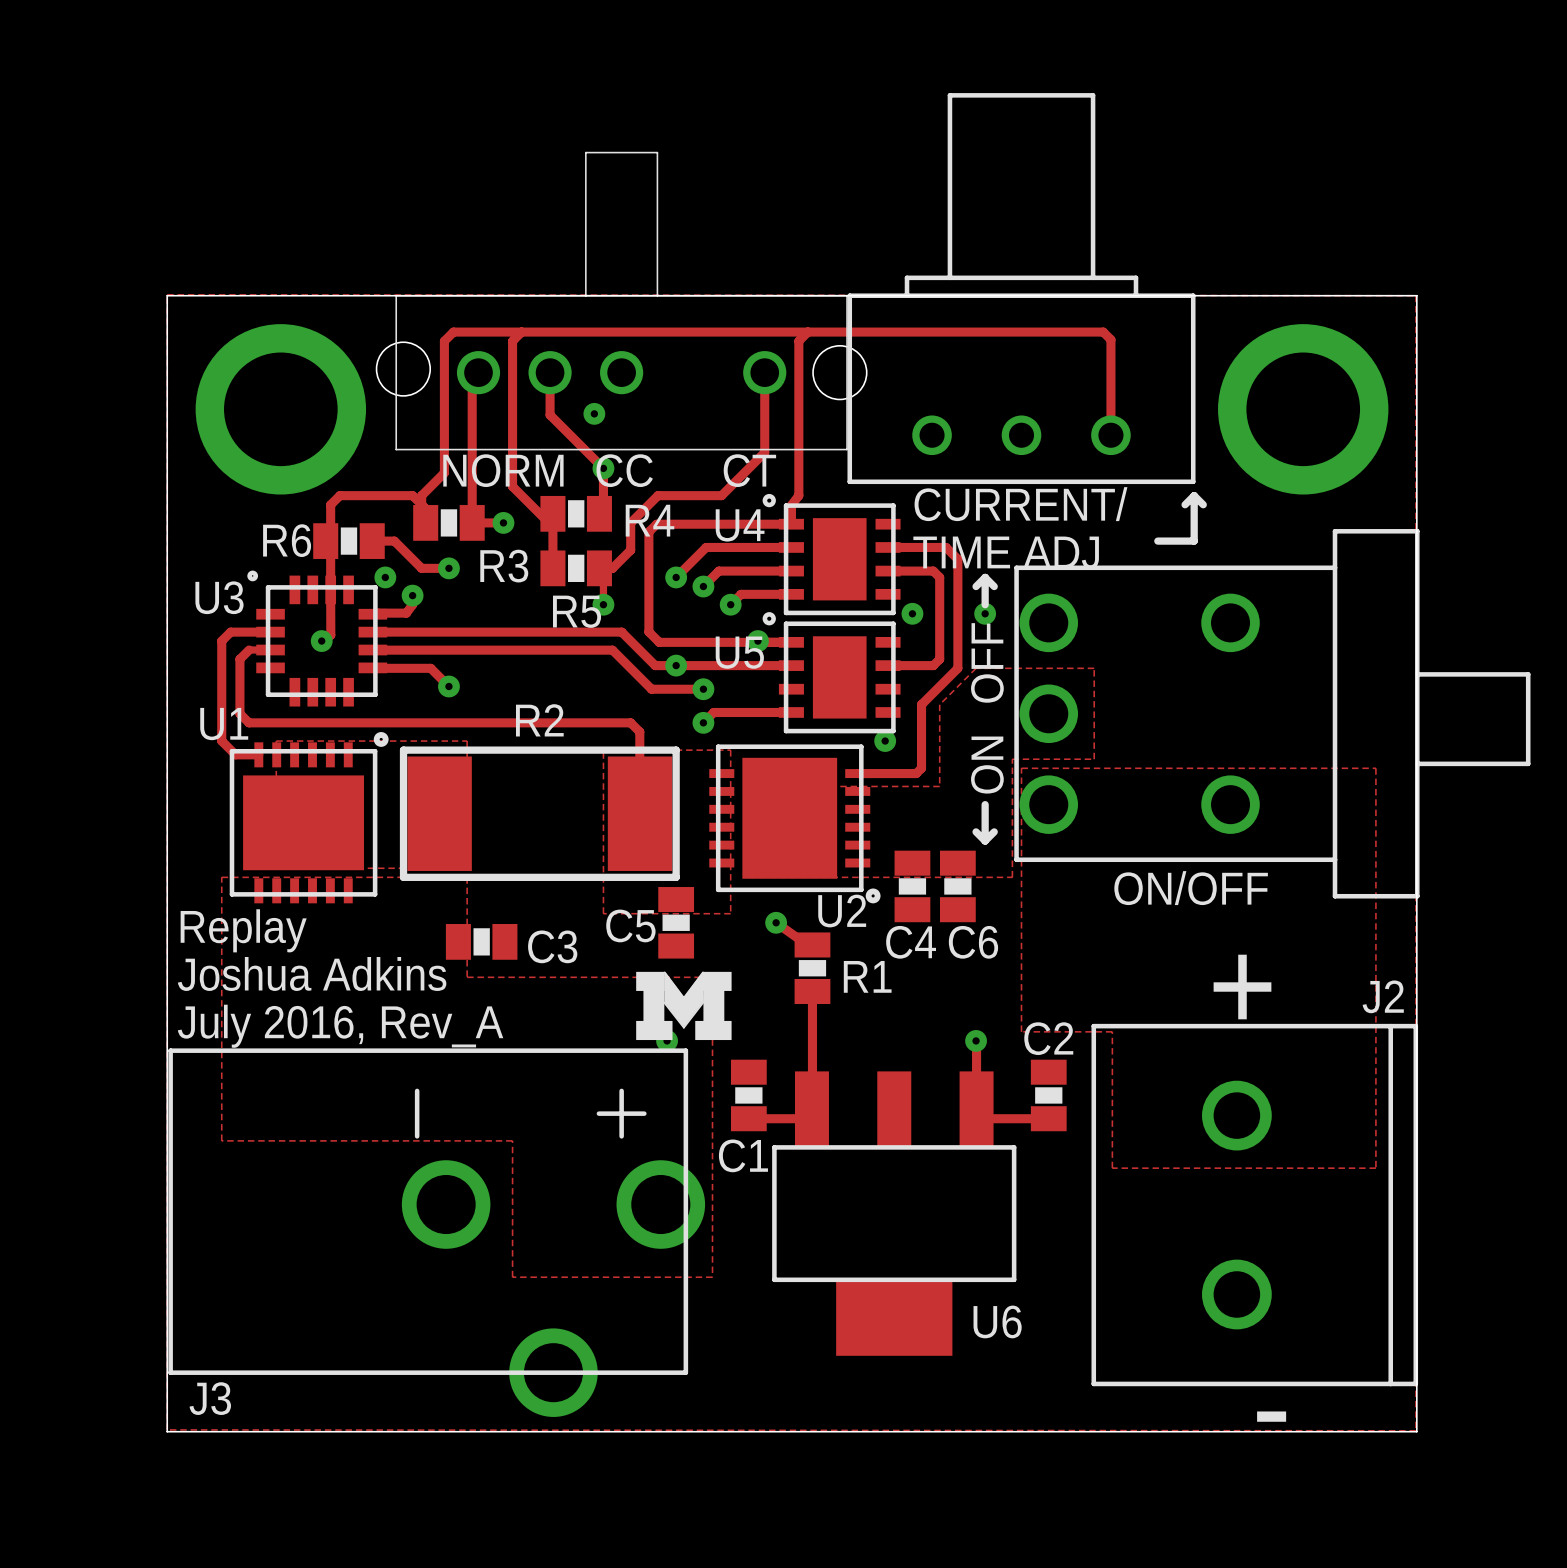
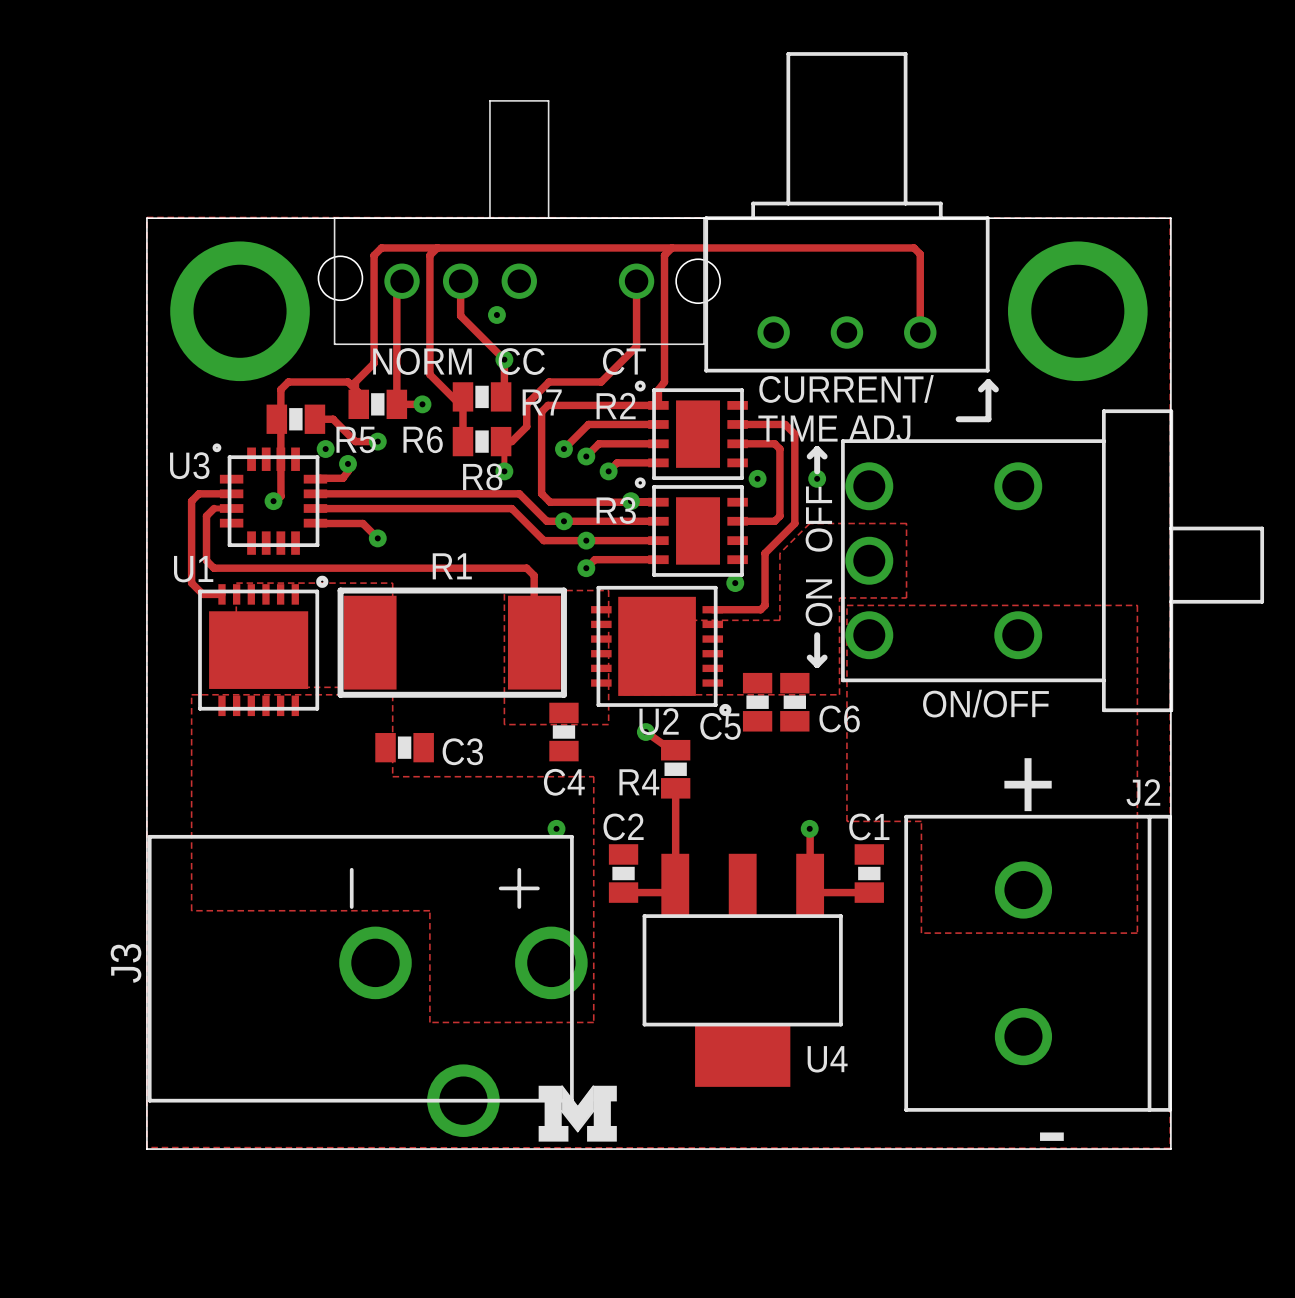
R4 name: R4 (649, 520) -> R7 (542, 402)
U4 name: U4 (740, 525) -> R2 (616, 406)
R6 name: R6 (287, 540) -> R5 (356, 439)
R3 name: R3 (504, 566) -> R6 (423, 439)
R5 name: R5 (577, 611) -> R8 (482, 476)
U5 name: U5 (739, 652) -> R3 (616, 510)
track: none -> (586, 540) (658, 540)
R2 name: R2 (539, 720) -> R1 (452, 566)
U2 name position: U2 (842, 911) -> U2 (659, 721)
C5 name: C5 (630, 925) -> C4 (564, 782)
text: Replay (243, 930) -> none
C4 name: C4 (911, 942) -> C5 (720, 726)
C6 name position: C6 (973, 942) -> C6 (839, 718)
text: Joshua Adkins (312, 973) -> none
R1 name: R1 (867, 976) -> R4 (639, 782)
drawing position: (683, 1005) -> (577, 1113)
text: July 2016, Rev_A (340, 1026) -> none
C2 name: C2 (1048, 1038) -> C1 (869, 826)
C1 name: C1 (743, 1155) -> C2 (623, 826)
U6 name: U6 (997, 1321) -> U4 (827, 1059)
J3 name rotation: 0° (210, 1398) -> 90° counterclockwise (126, 963)
J3 name position: J3 (210, 1398) -> J3 (126, 963)

